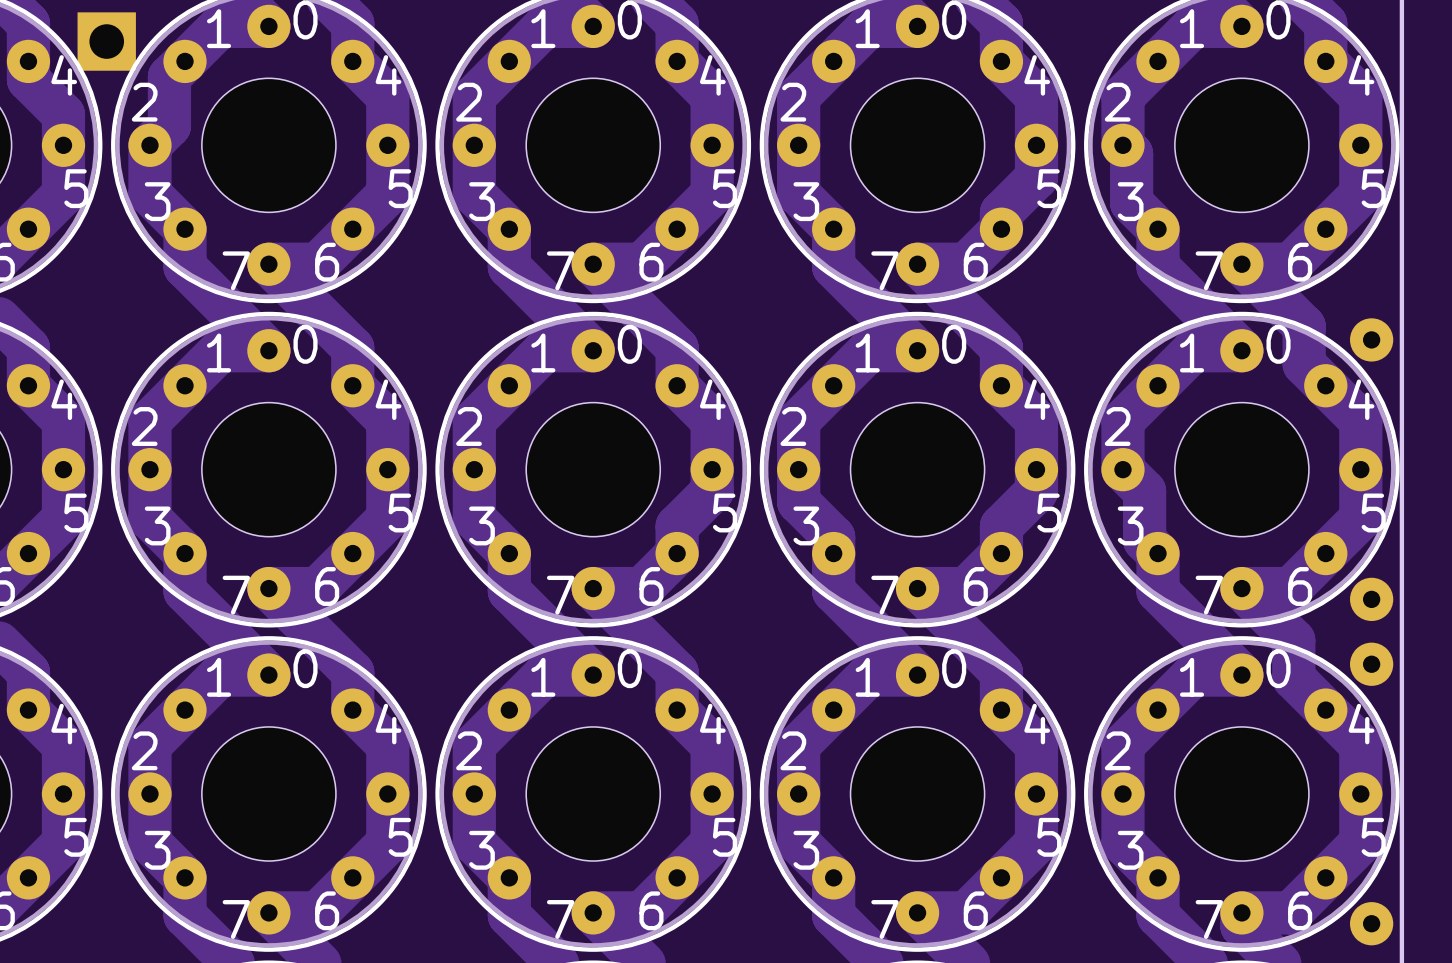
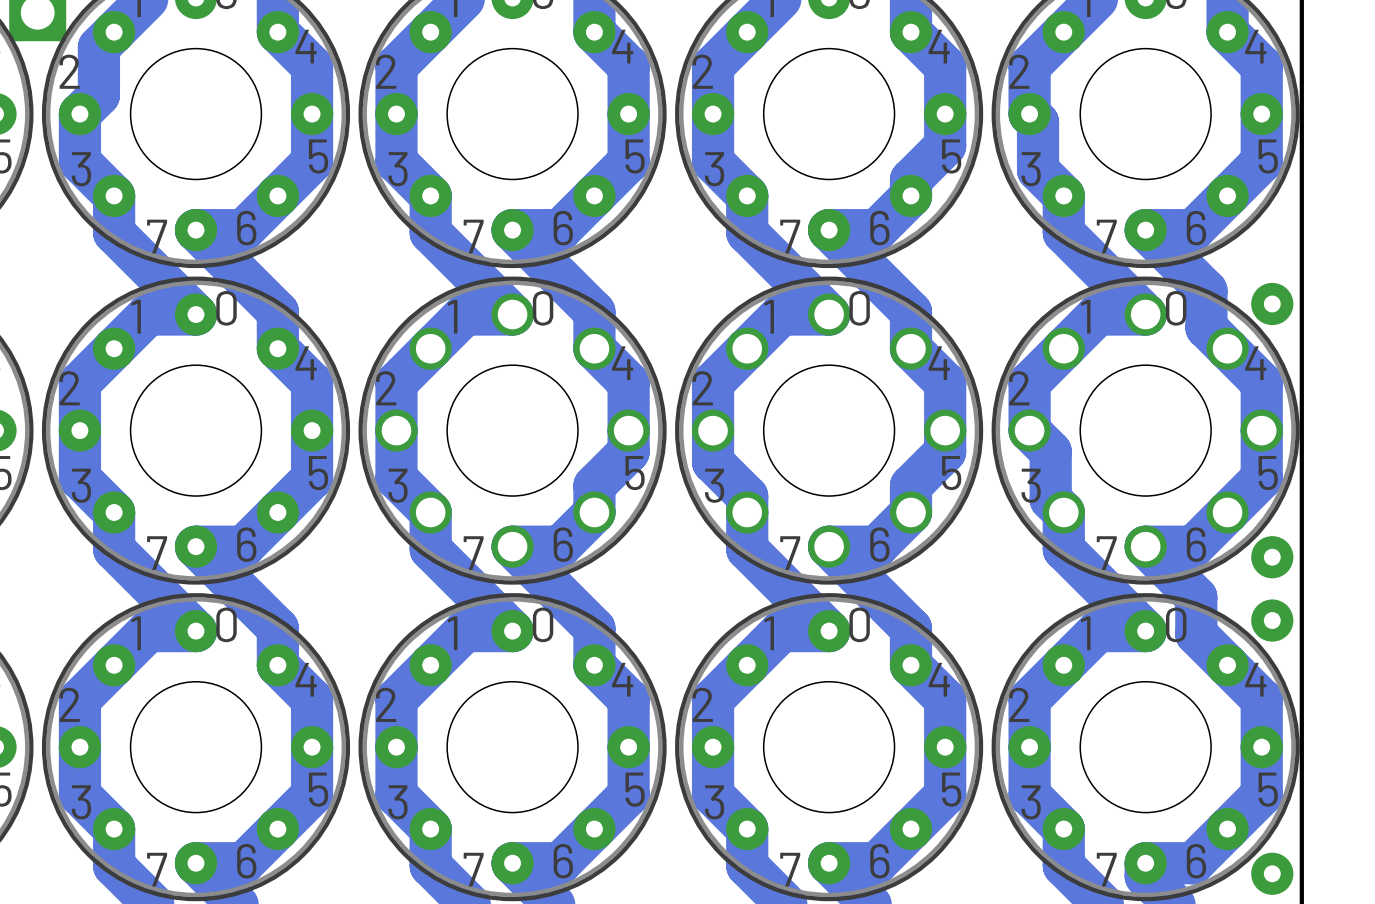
part footprint: [435, 311, 752, 628] -> [358, 276, 667, 585]
part footprint: [759, 311, 1076, 628] -> [675, 276, 984, 585]
part footprint: [1084, 311, 1400, 628] -> [991, 276, 1300, 585]

